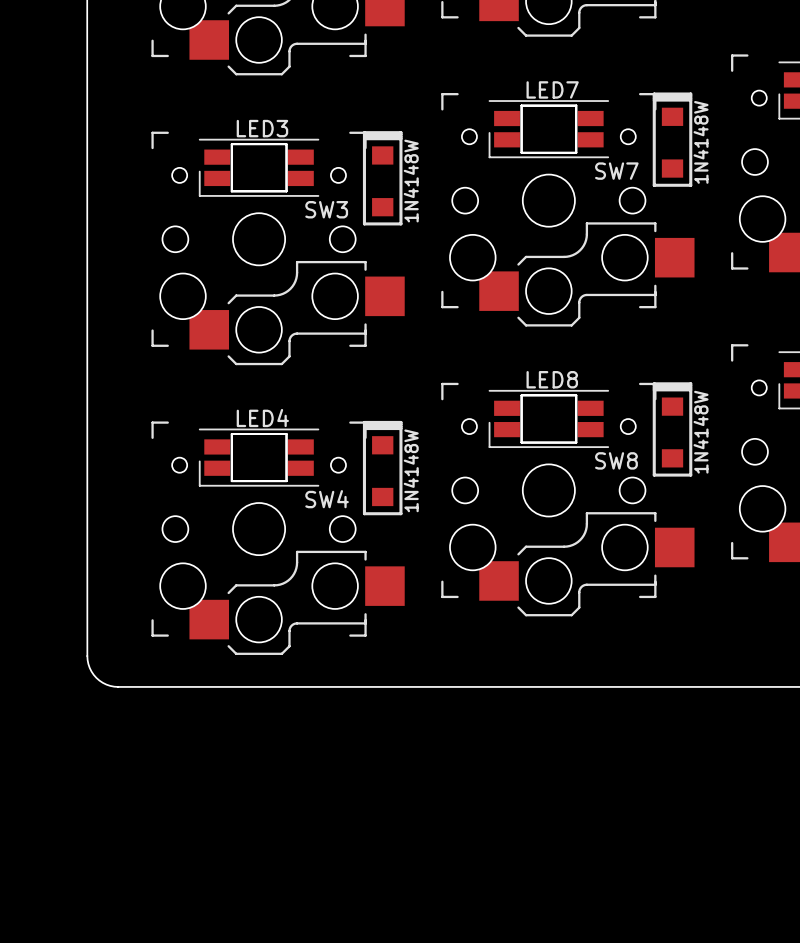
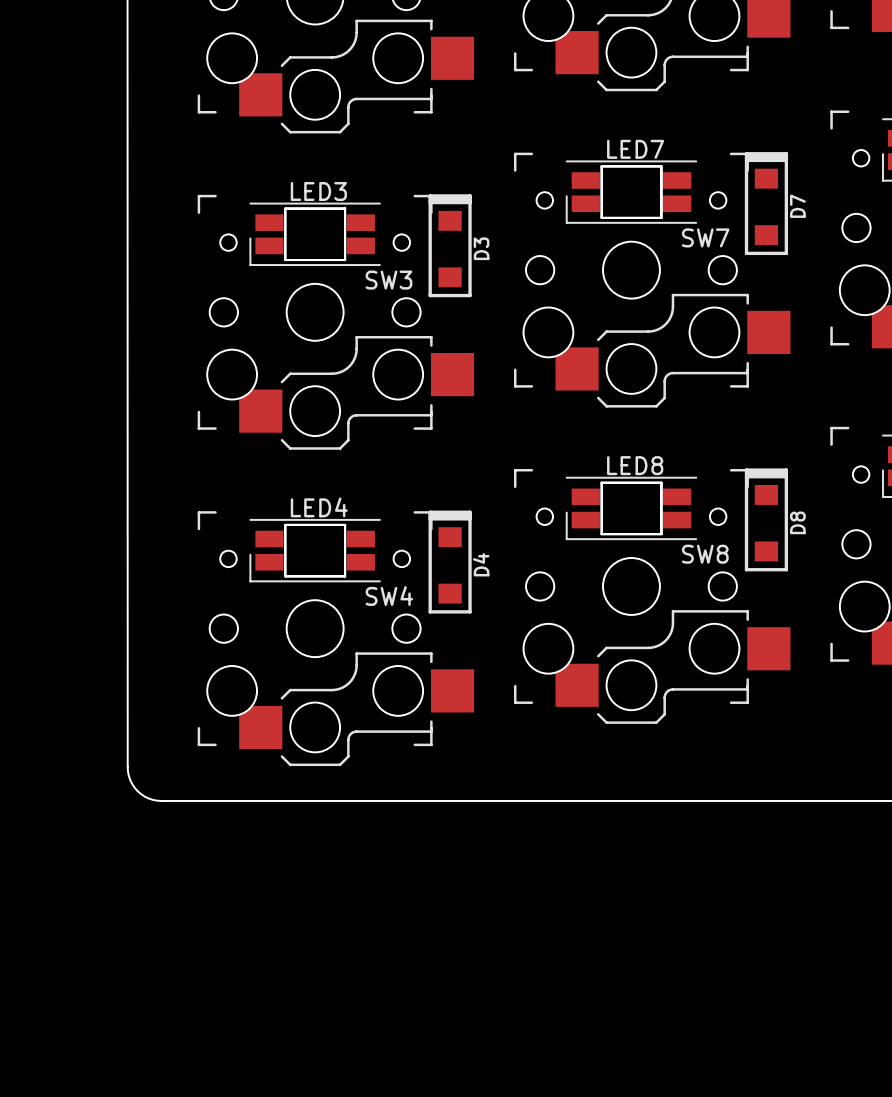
part value: 1N4148W (701, 142) -> D7 (797, 206)
part value: 1N4148W (411, 181) -> D3 (481, 248)
part value: 1N4148W (701, 432) -> D8 (797, 522)
part value: 1N4148W (411, 470) -> D4 (481, 564)

